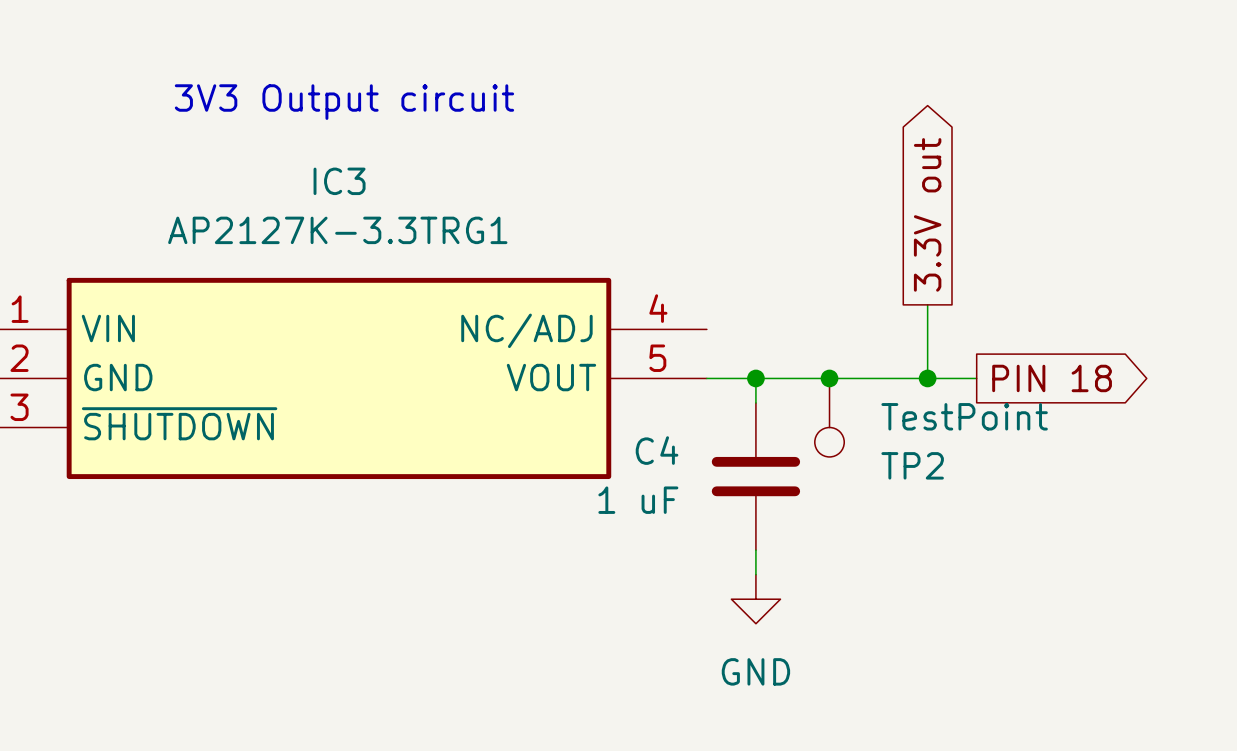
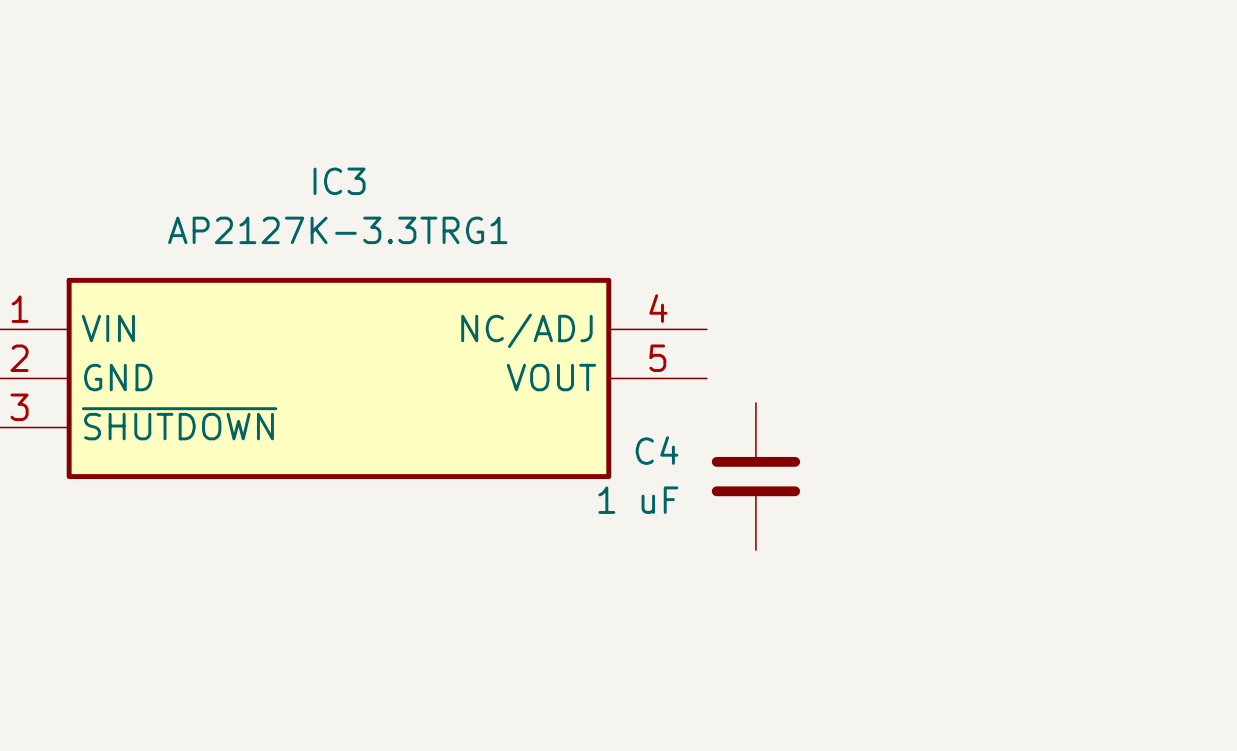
text: 3V3 Output circuit (344, 102) -> none
global label: 3.3V out (927, 214) -> none
wire: (927, 304) (927, 378) -> none
wire: (706, 378) (976, 378) -> none
wire: (755, 378) (755, 402) -> none
junction: (755, 378) -> none
junction: (829, 378) -> none
junction: (927, 378) -> none
global label: PIN 18 (1052, 378) -> none
TP2: TestPoint (829, 417) -> none
wire: (755, 550) (755, 574) -> none
power symbol: GND (755, 599) -> none

